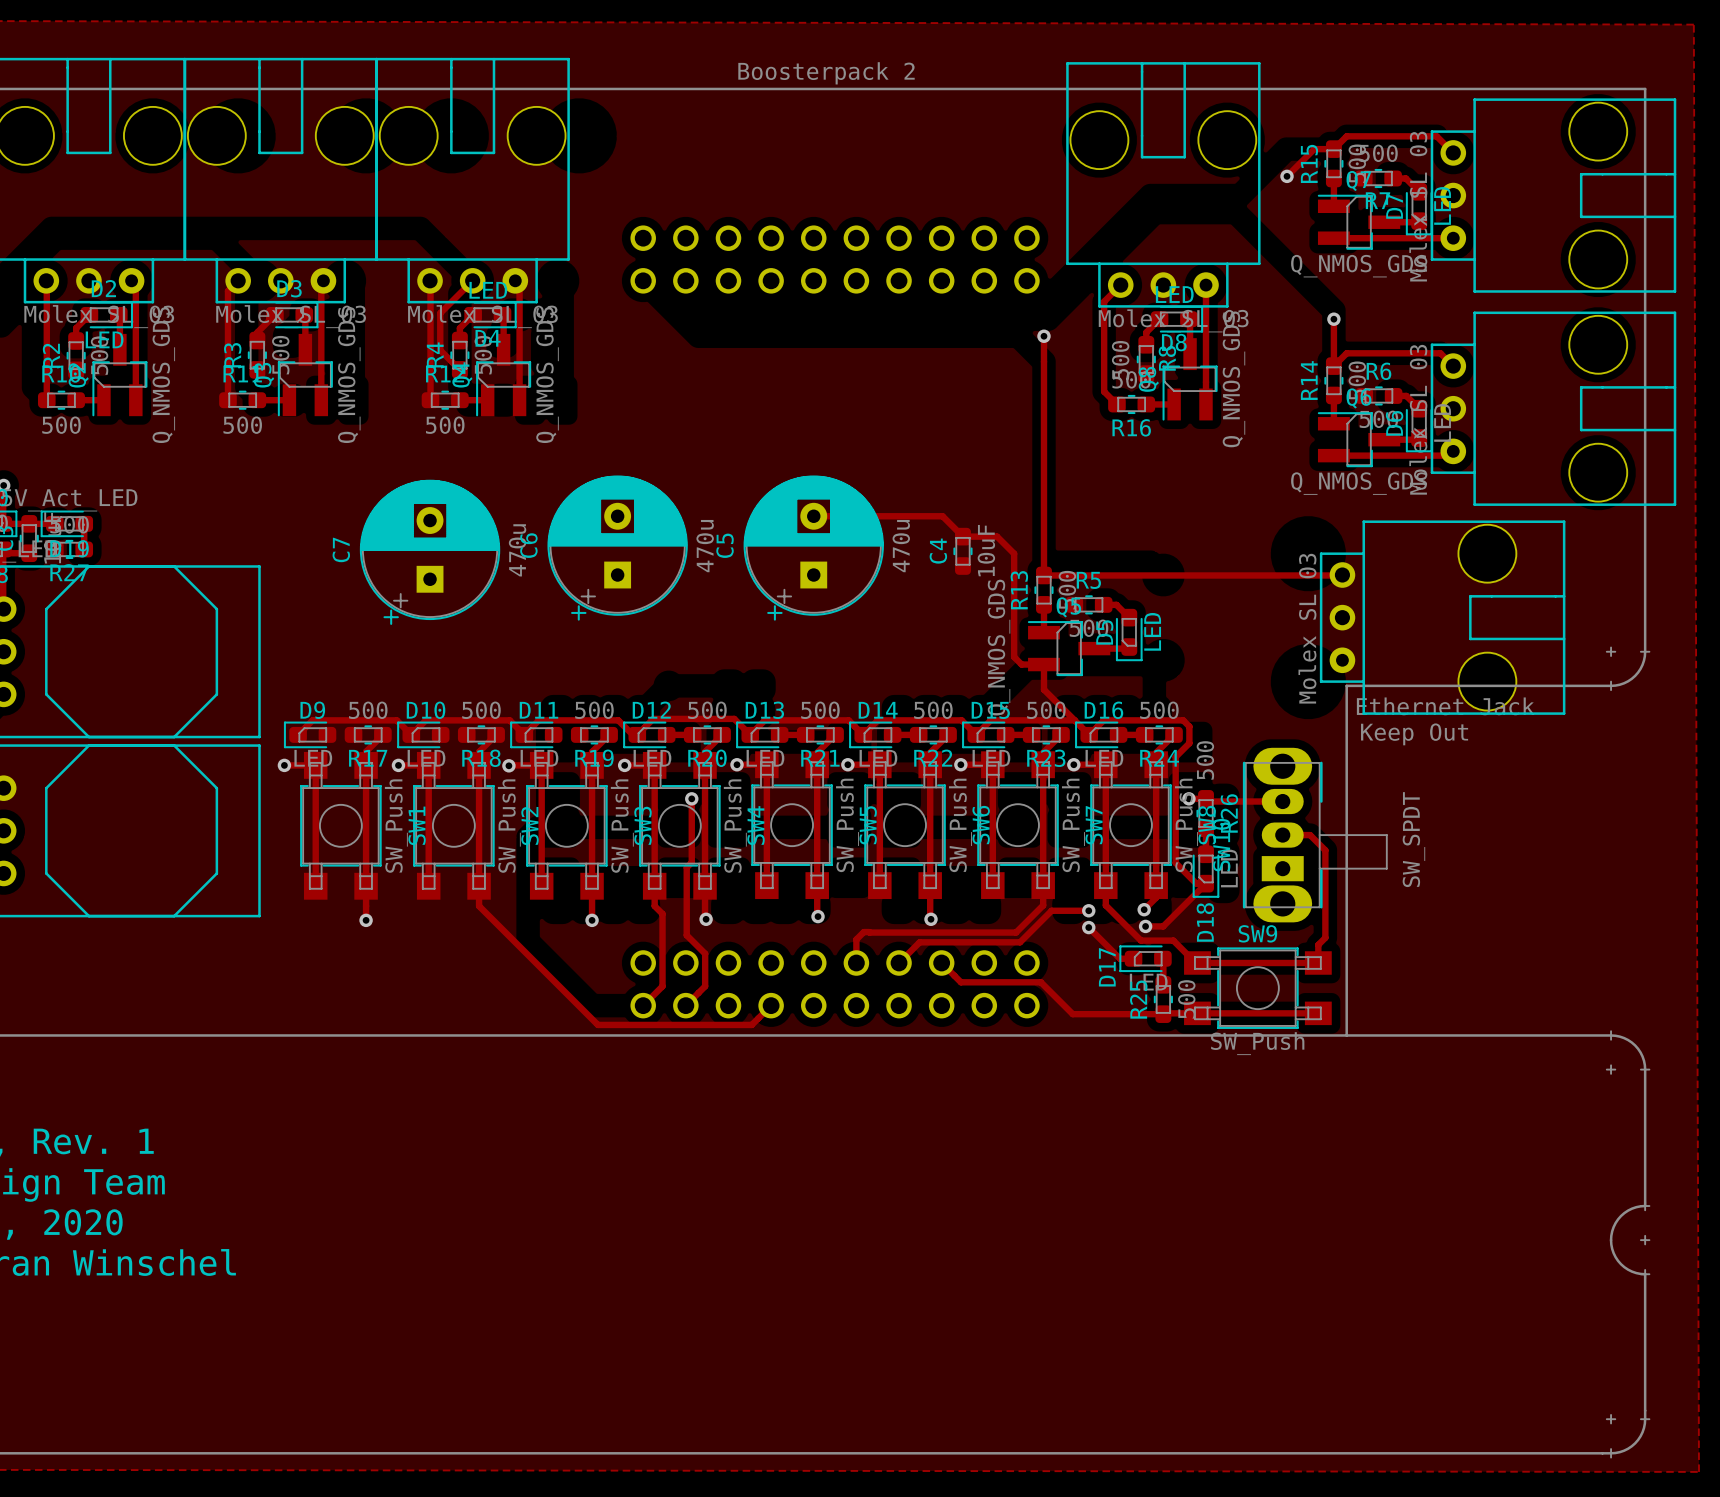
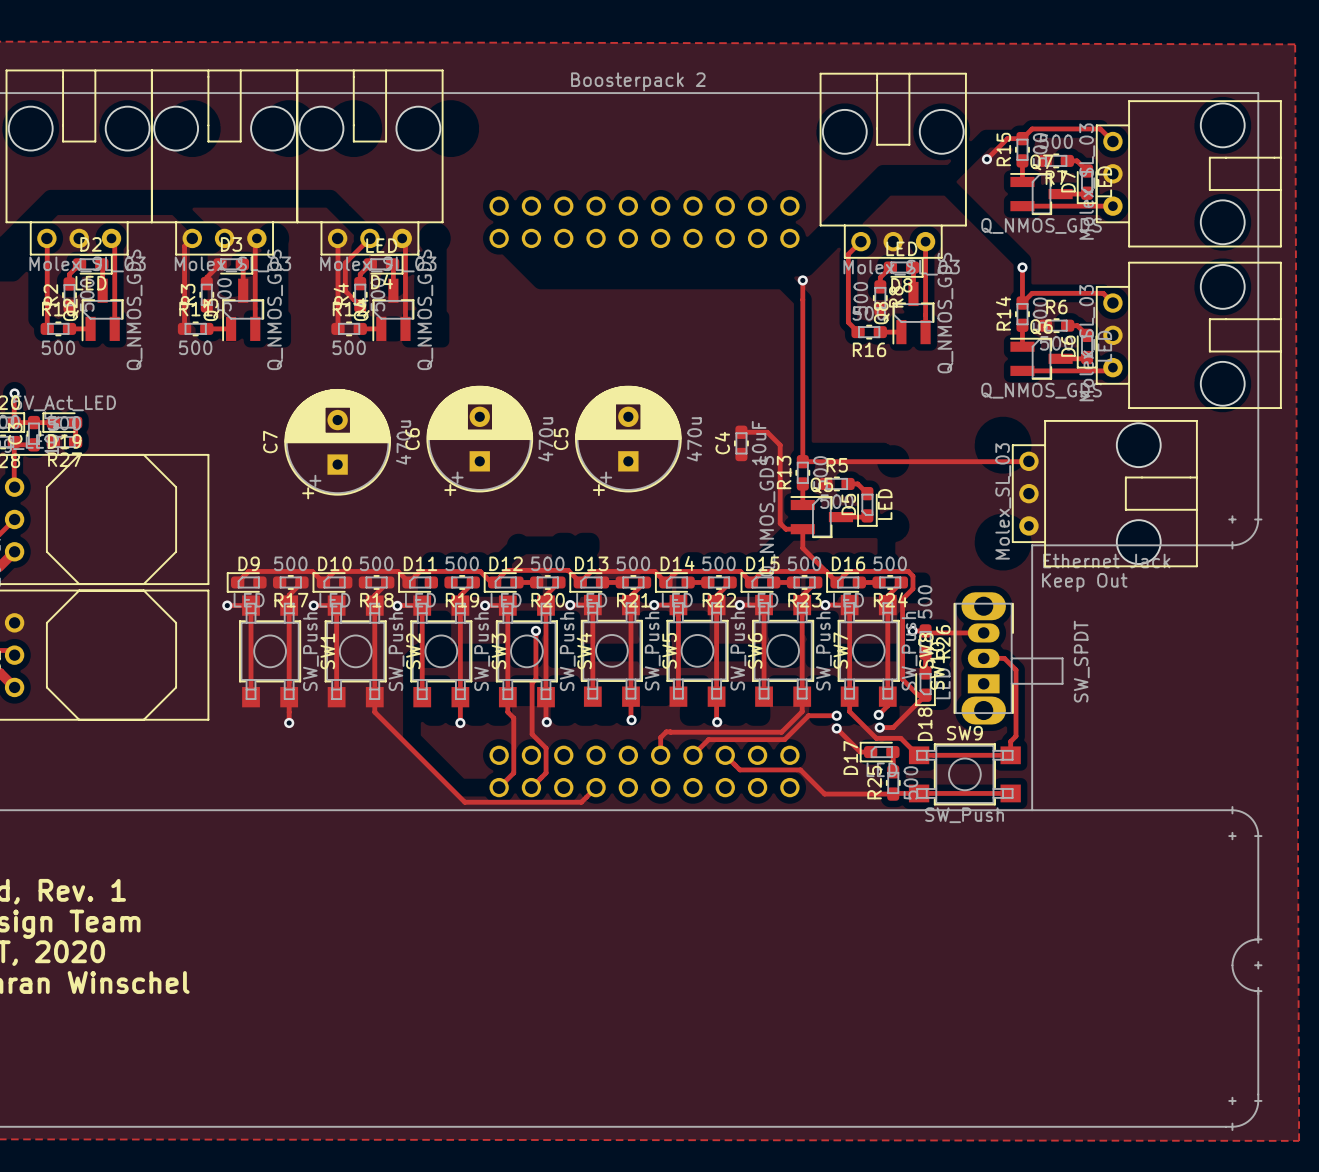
track: (813, 516) (942, 516) (962, 536) -> none

